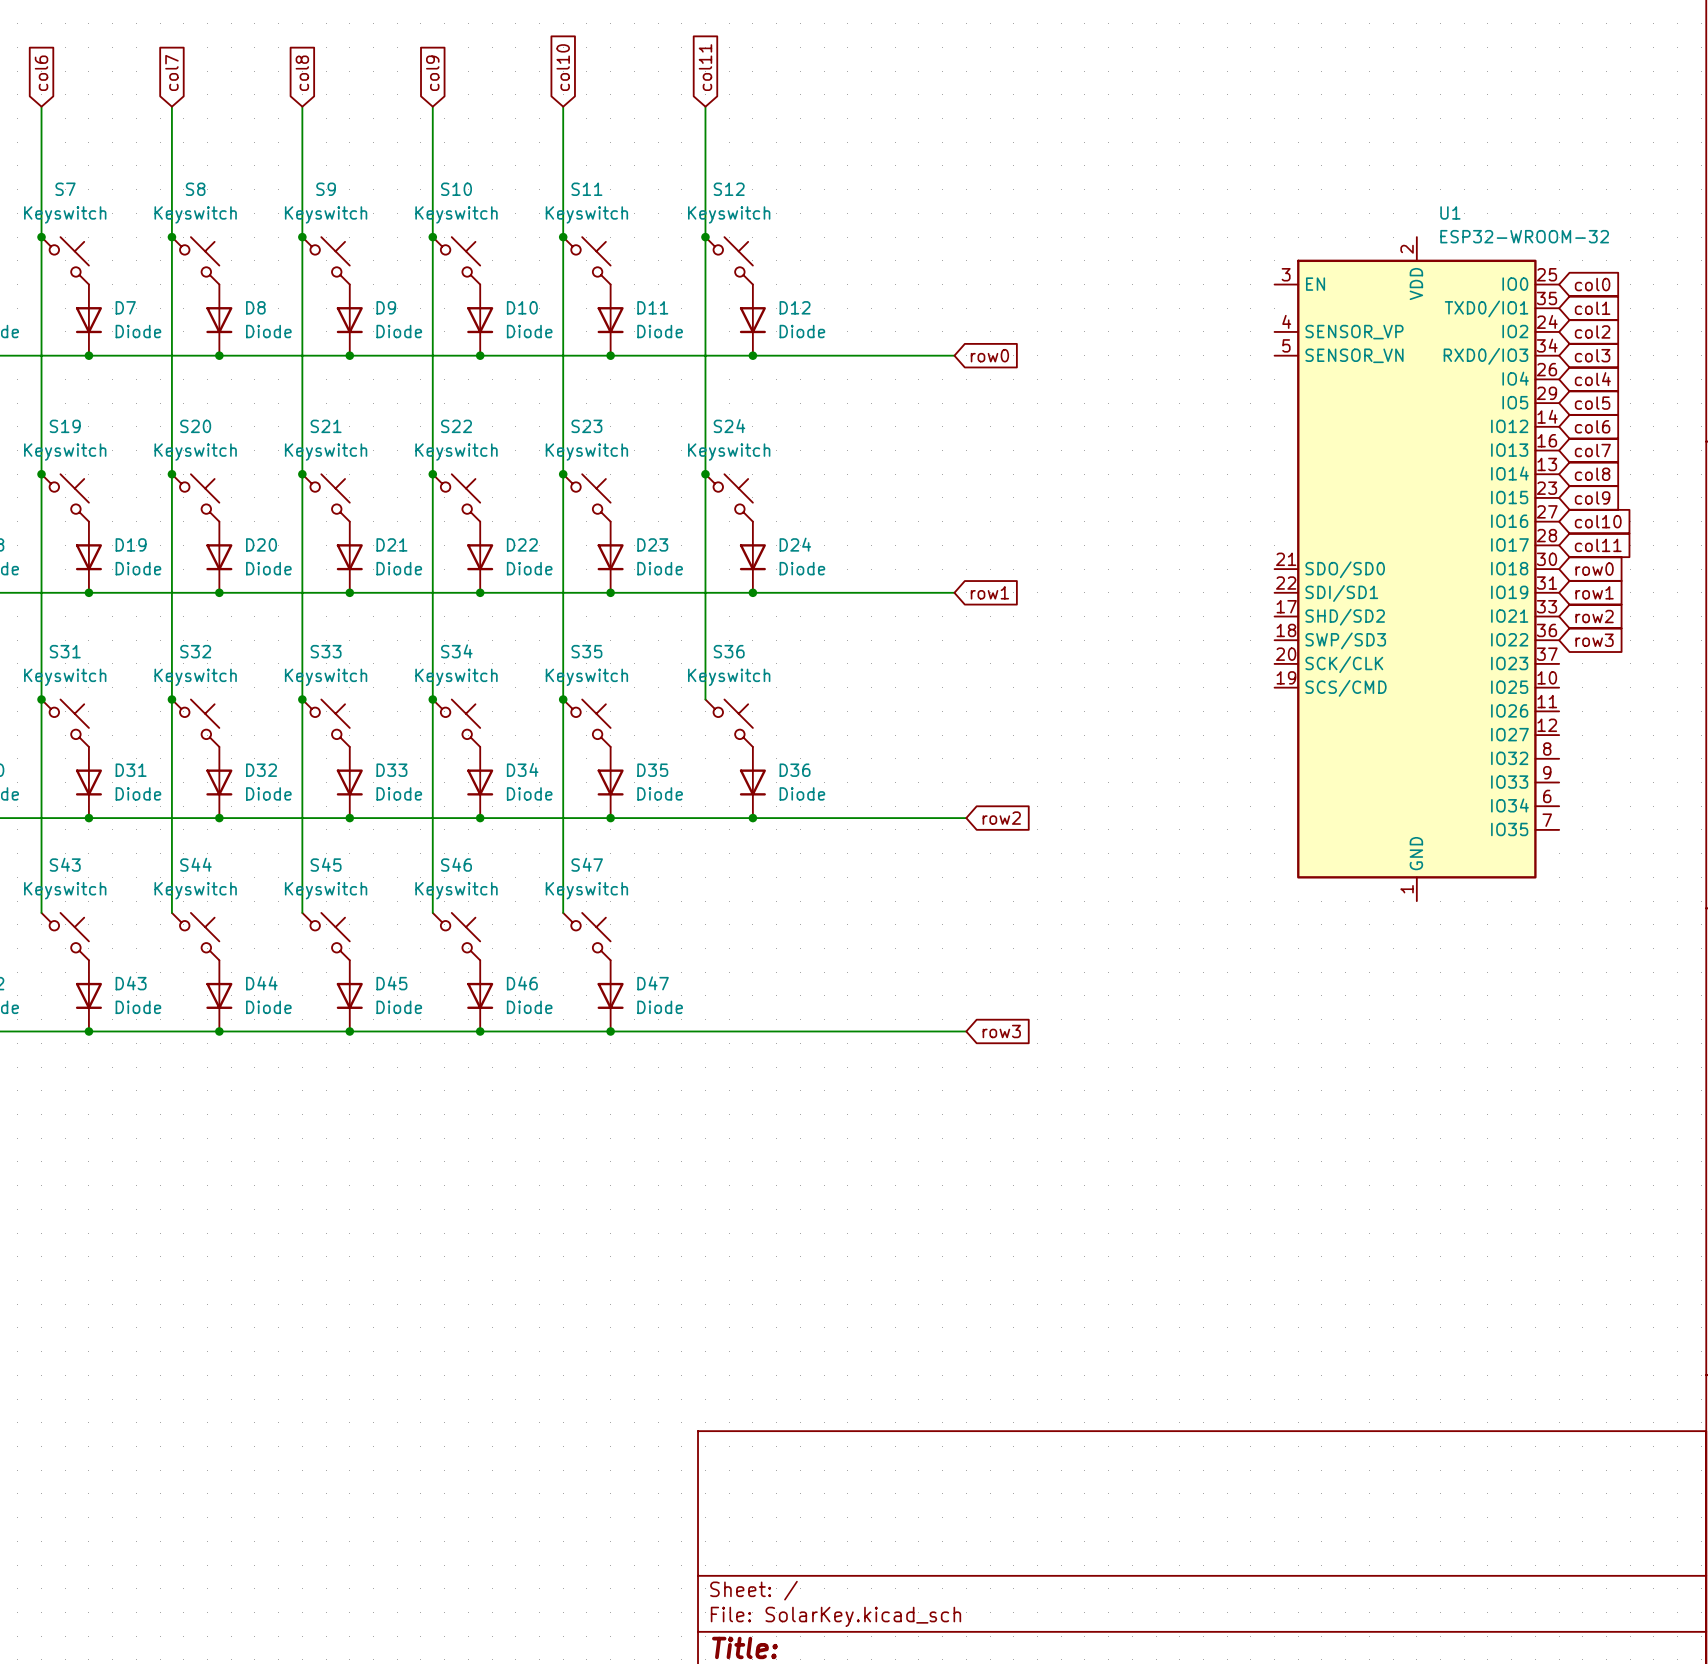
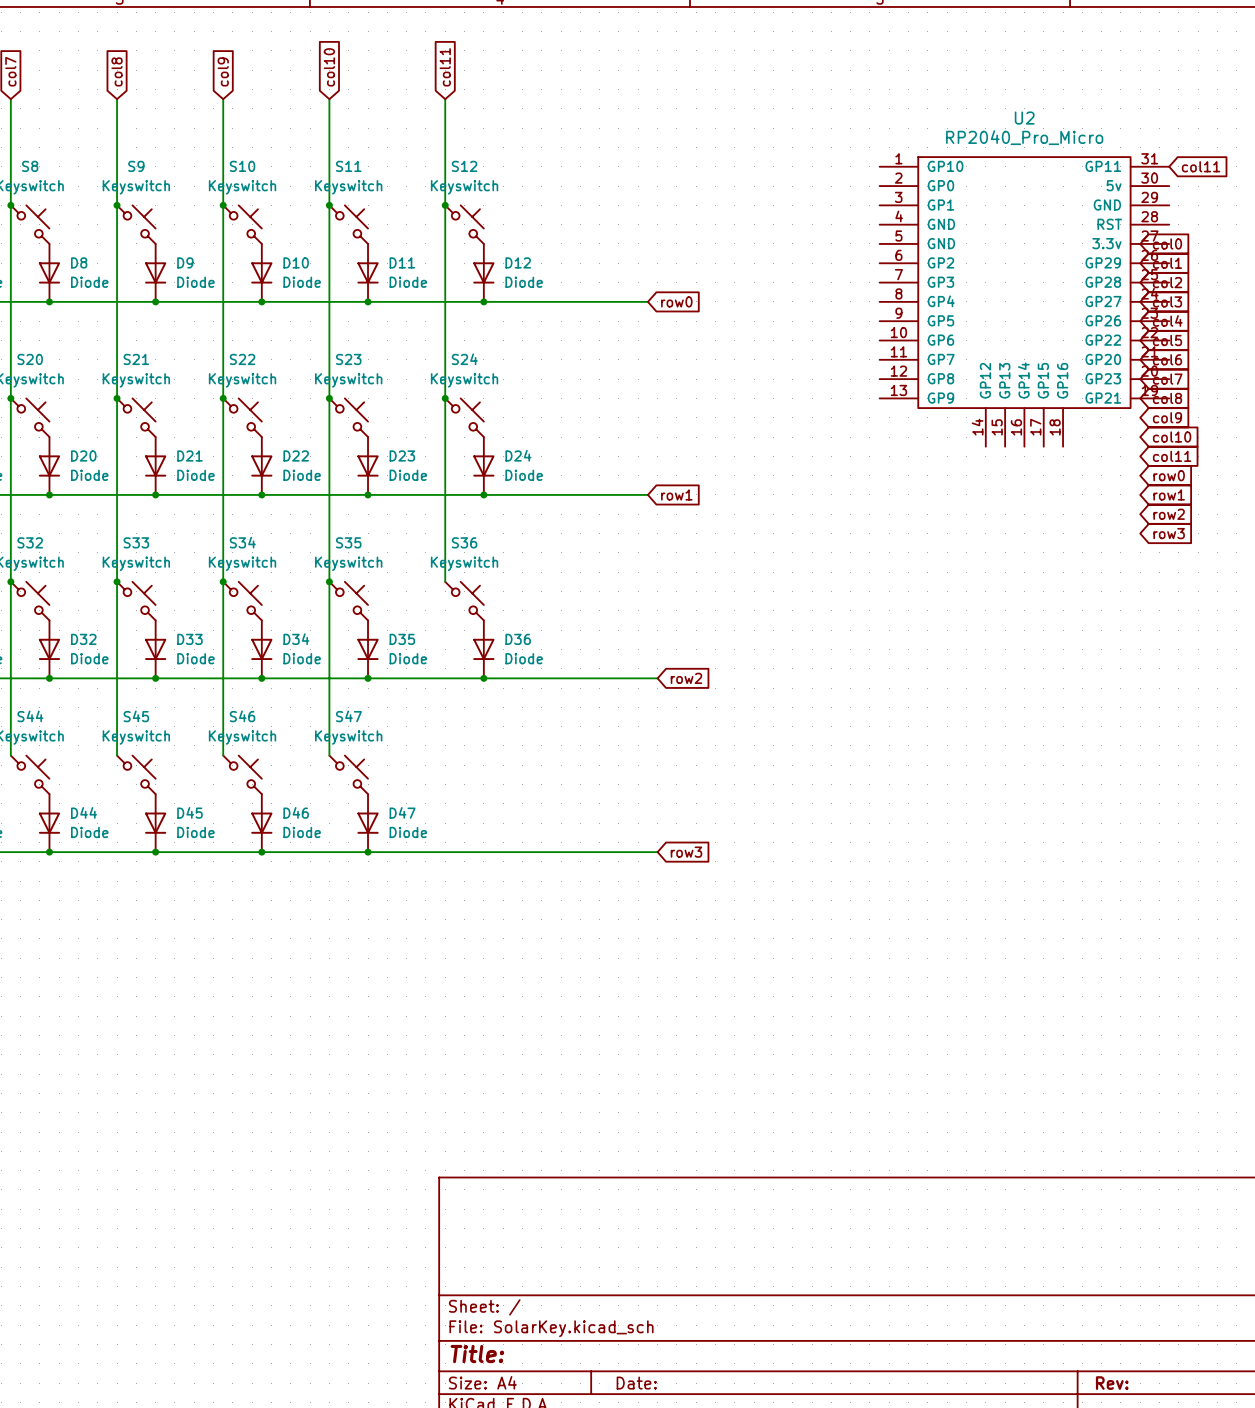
global label: none -> col11 (1201, 166)
U2: none -> RP2040_Pro_Micro (1024, 301)
U1: ESP32-WROOM-32 (1416, 569) -> none

